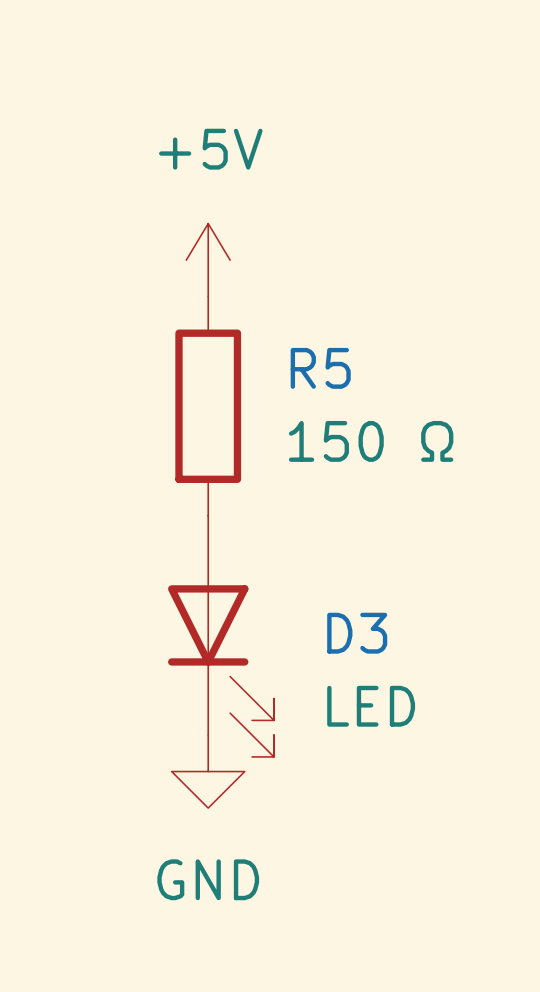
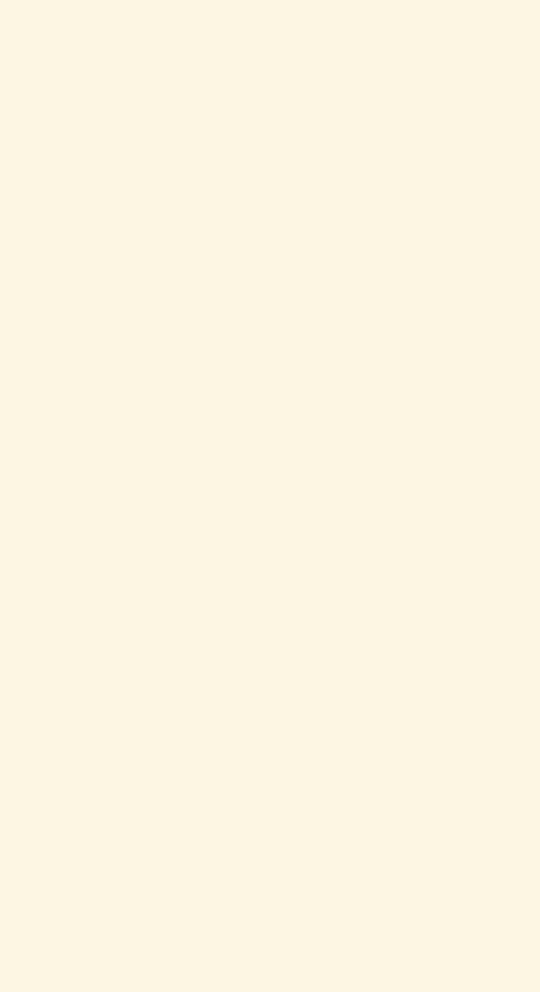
power symbol: +5V (208, 260) -> none
R5: 150 Ω (208, 406) -> none
D3: LED (221, 636) -> none
power symbol: GND (208, 771) -> none

